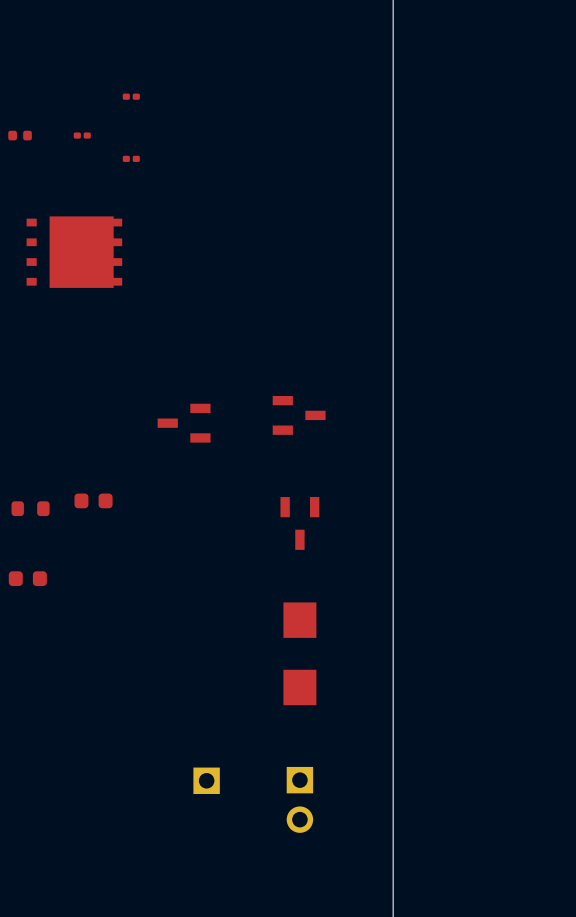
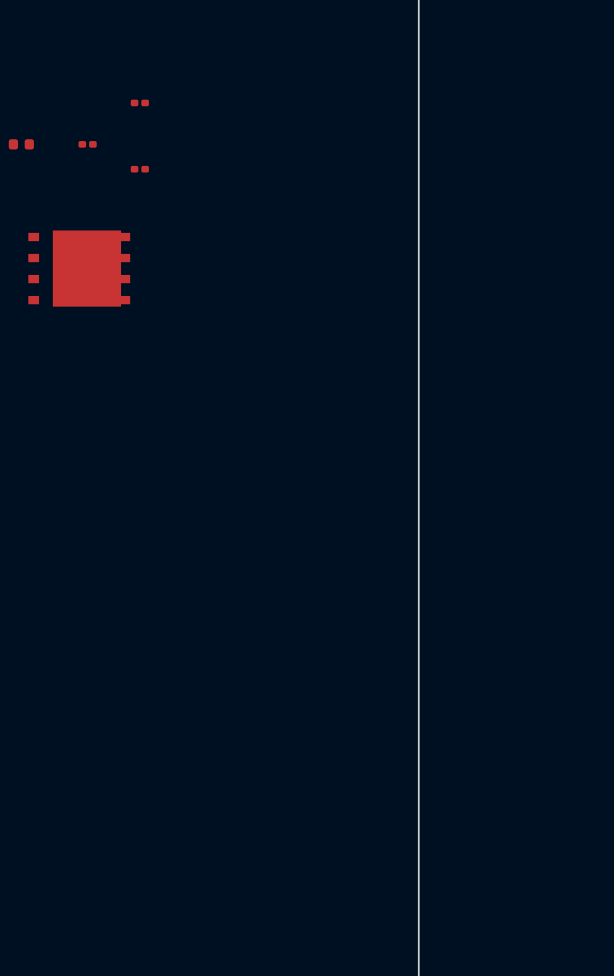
part: (299, 415) -> none
part: (184, 423) -> none
part: (93, 500) -> none
part: (30, 508) -> none
part: (299, 523) -> none
part: (27, 578) -> none
part: (299, 653) -> none
part: (206, 780) -> none
part: (299, 799) -> none

